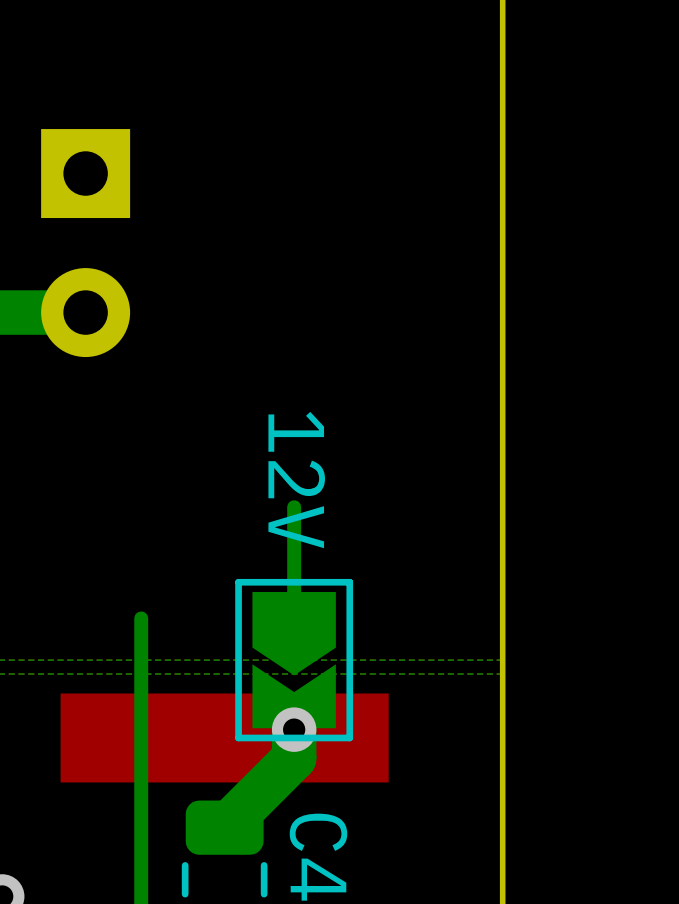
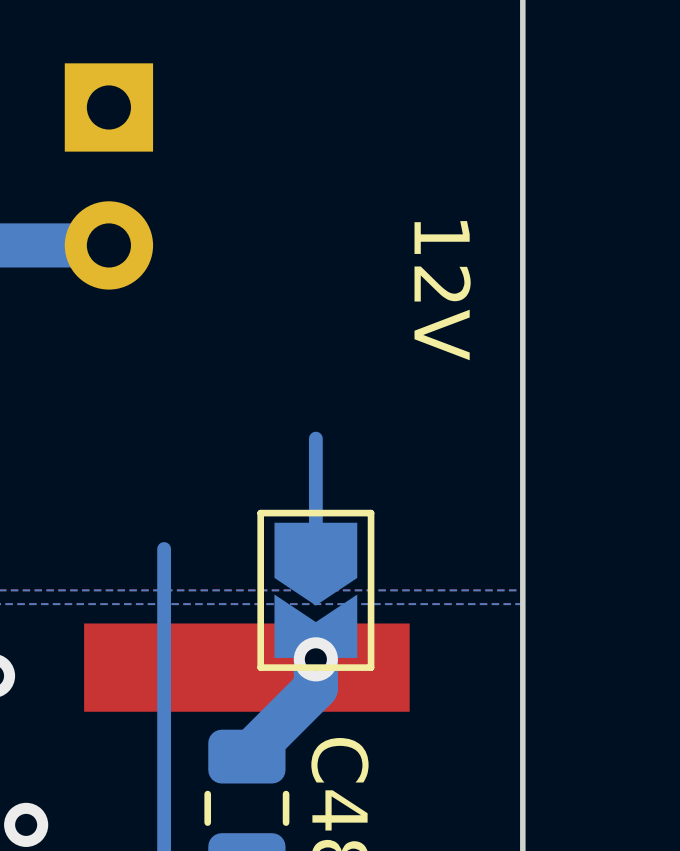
text position: 12V (296, 480) -> 12V (442, 290)

